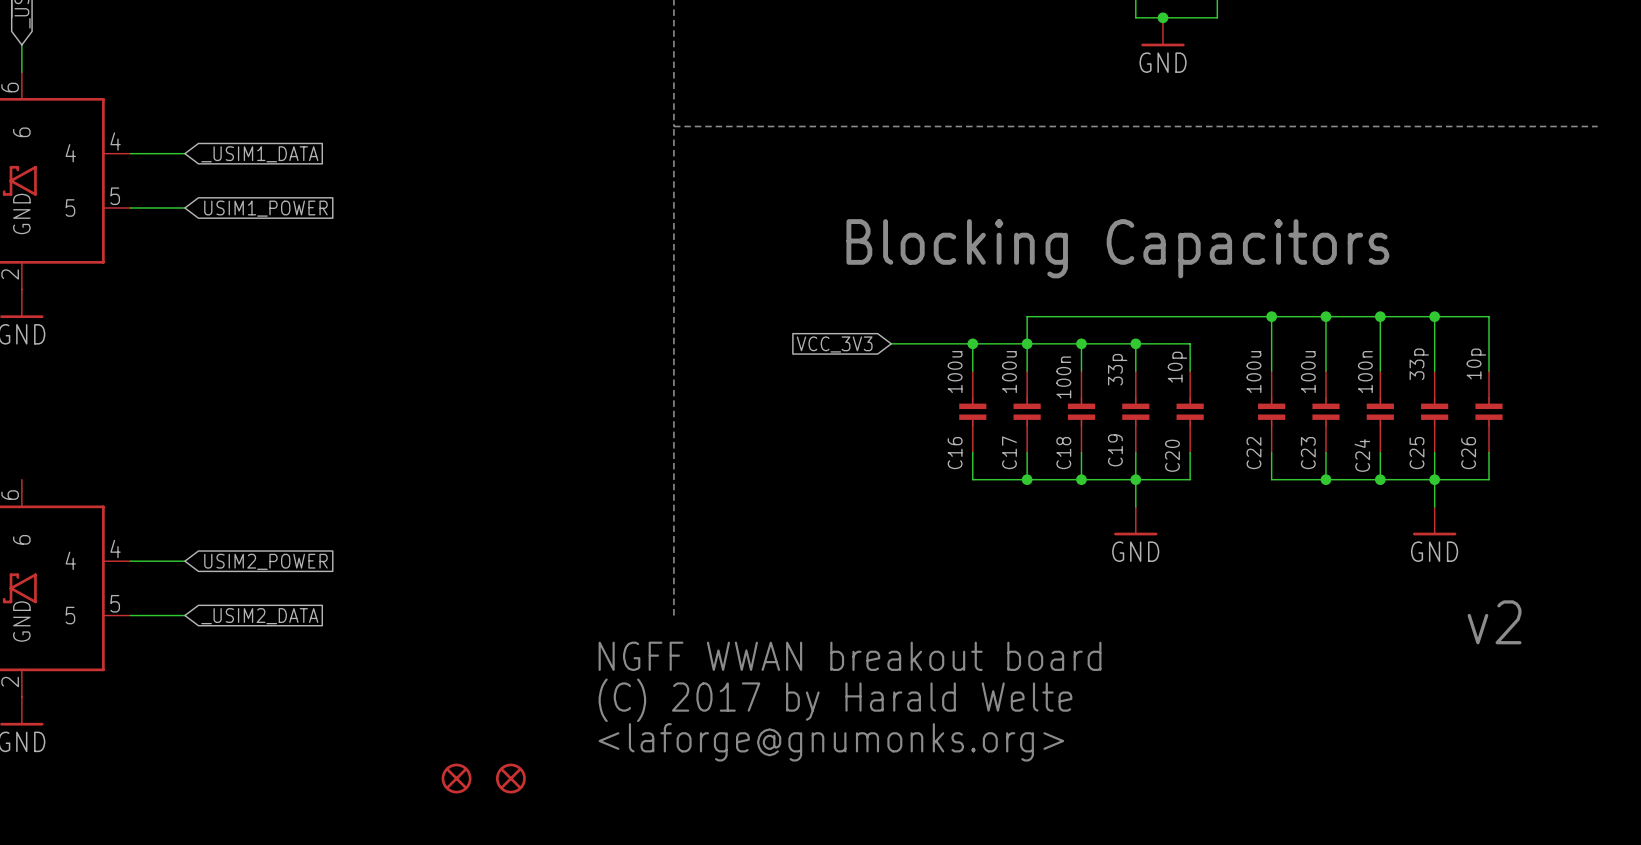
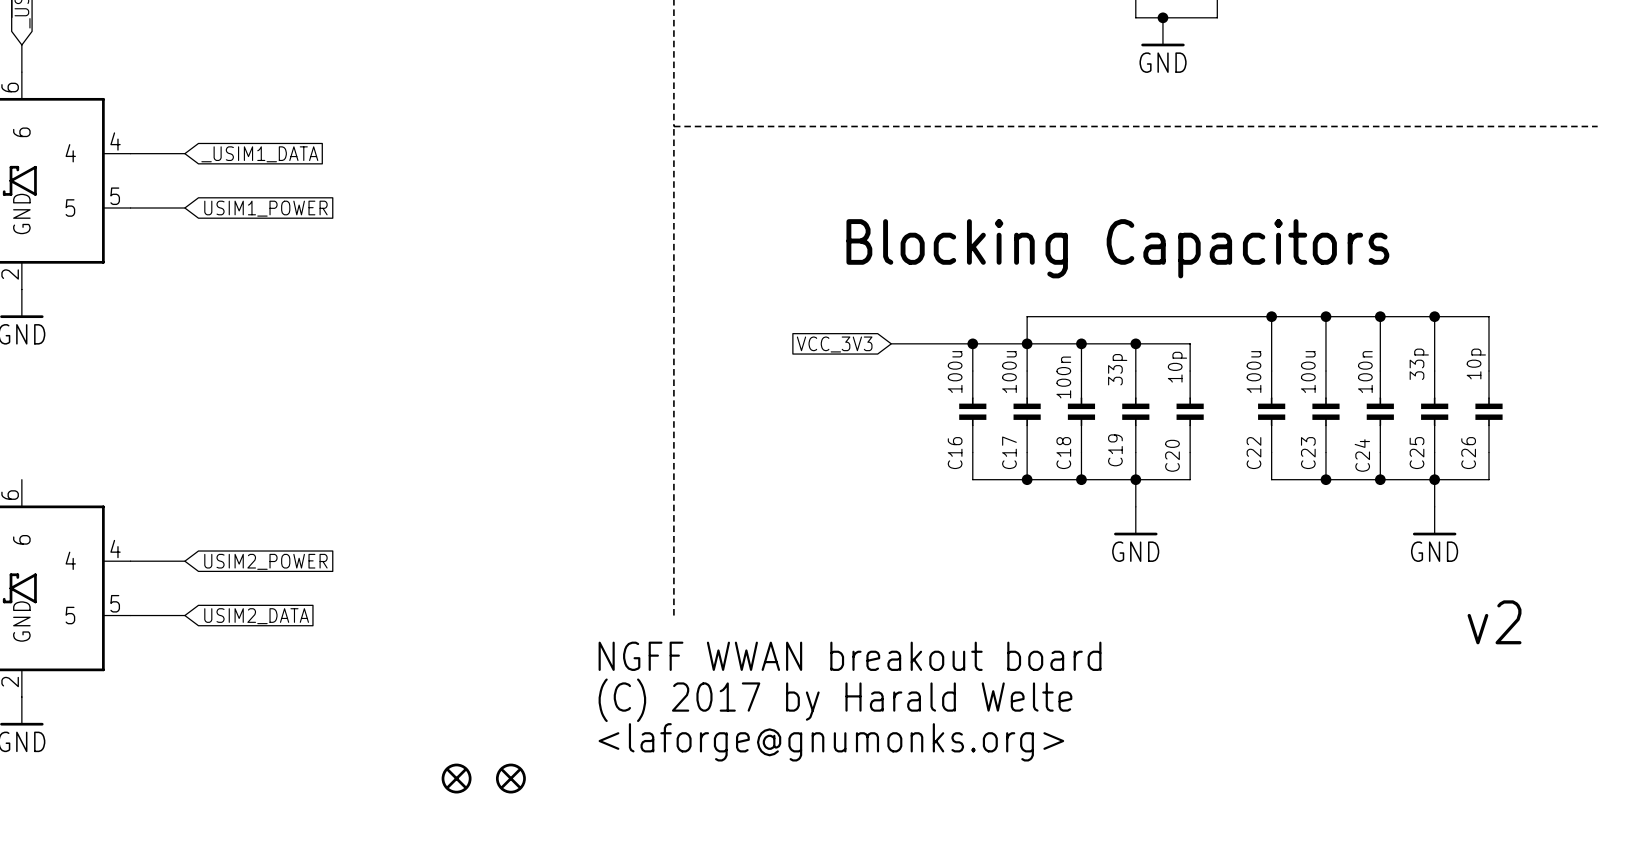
global label: _USIM2_DATA (259, 616) -> USIM2_DATA (256, 616)

